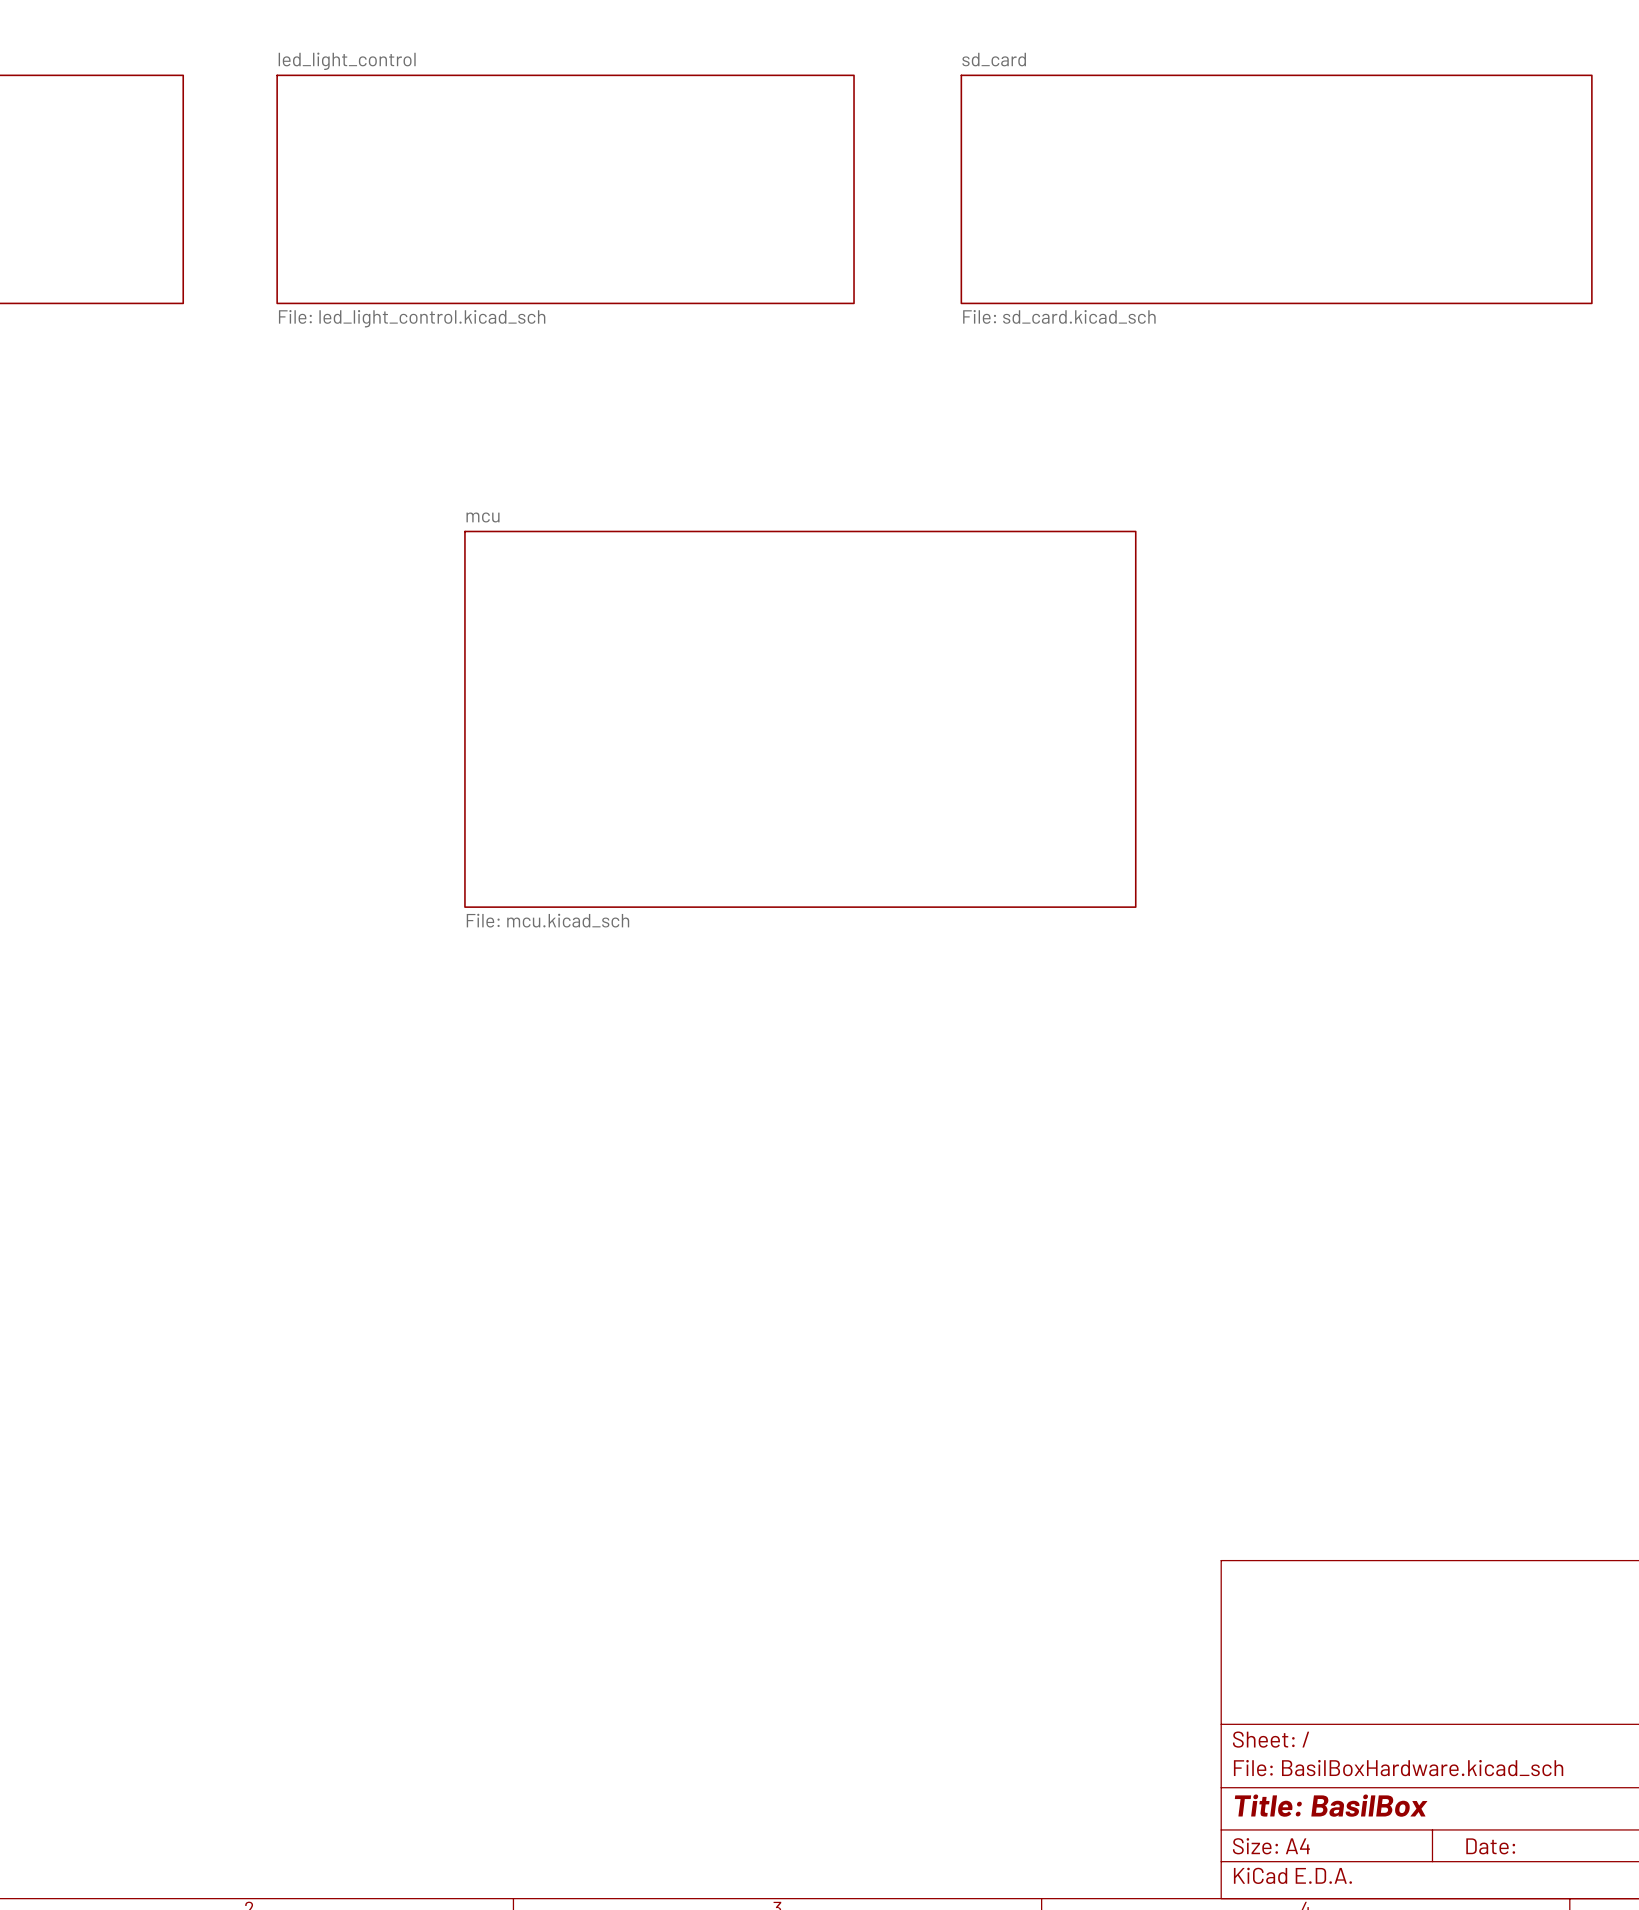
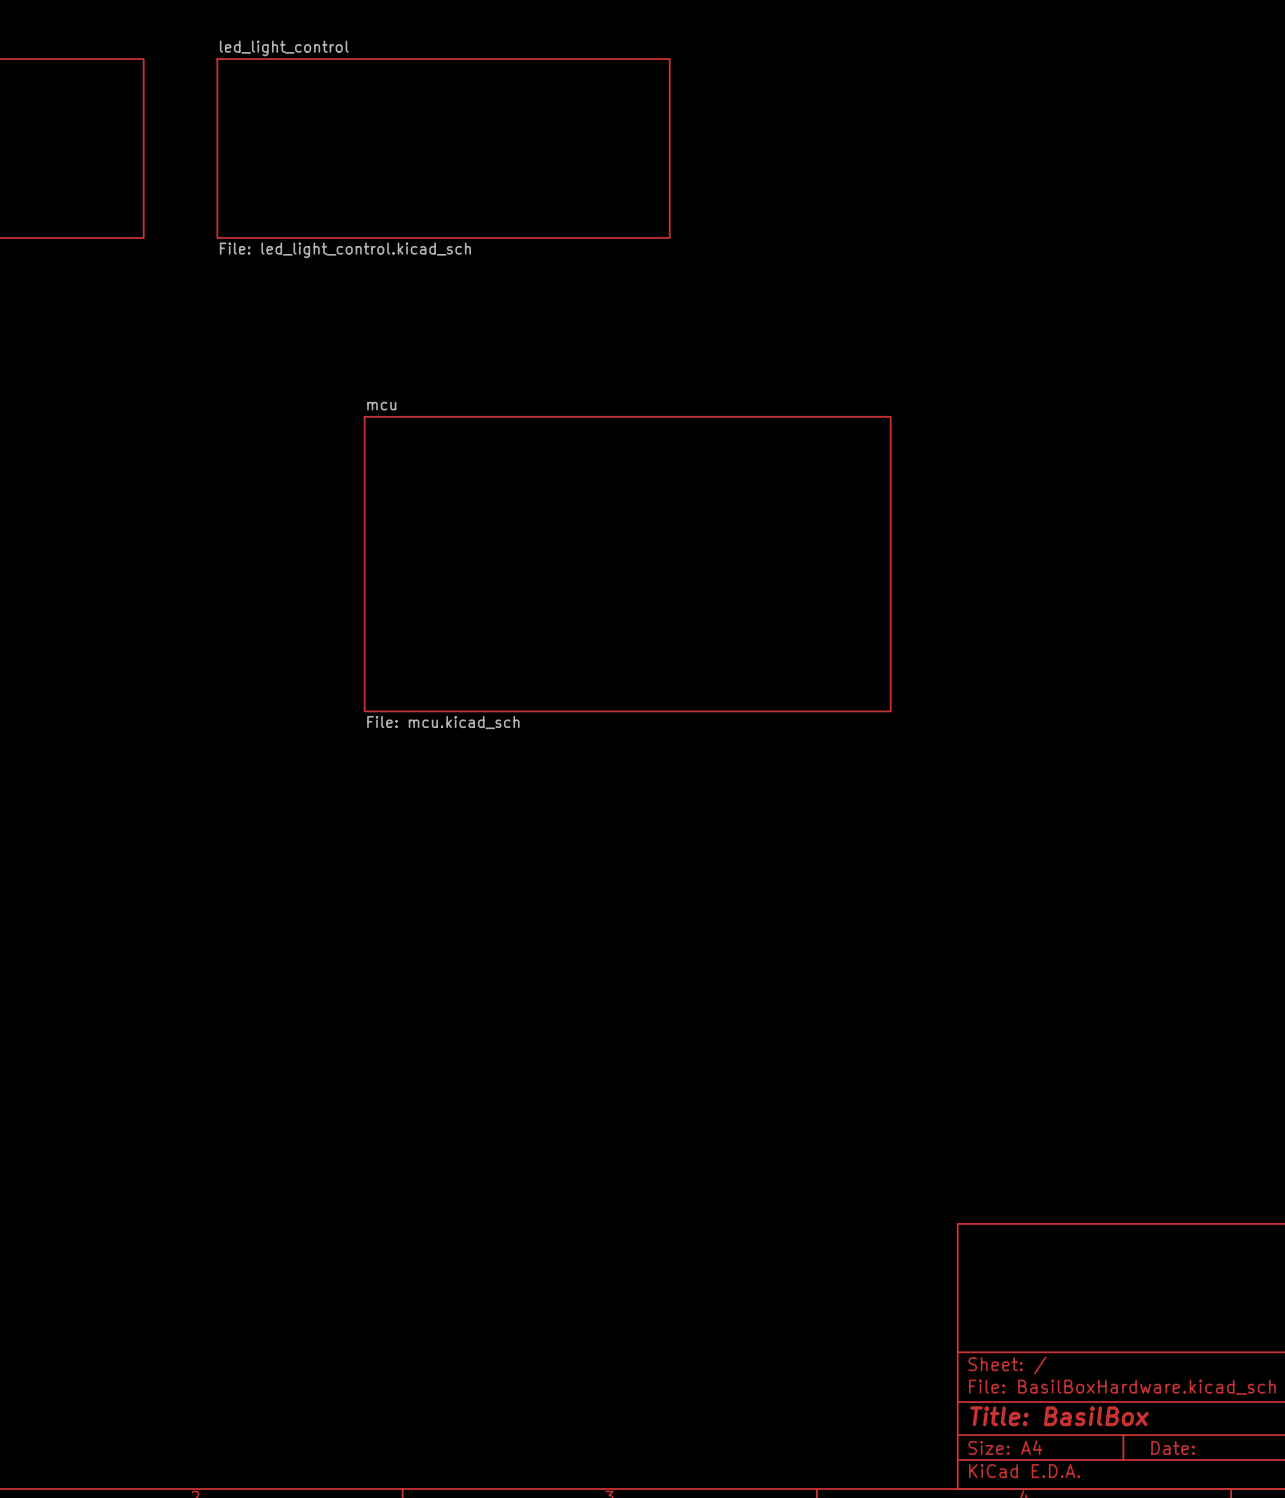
sheet sd_card: File: sd_card.kicad_sch (1276, 189) -> none

